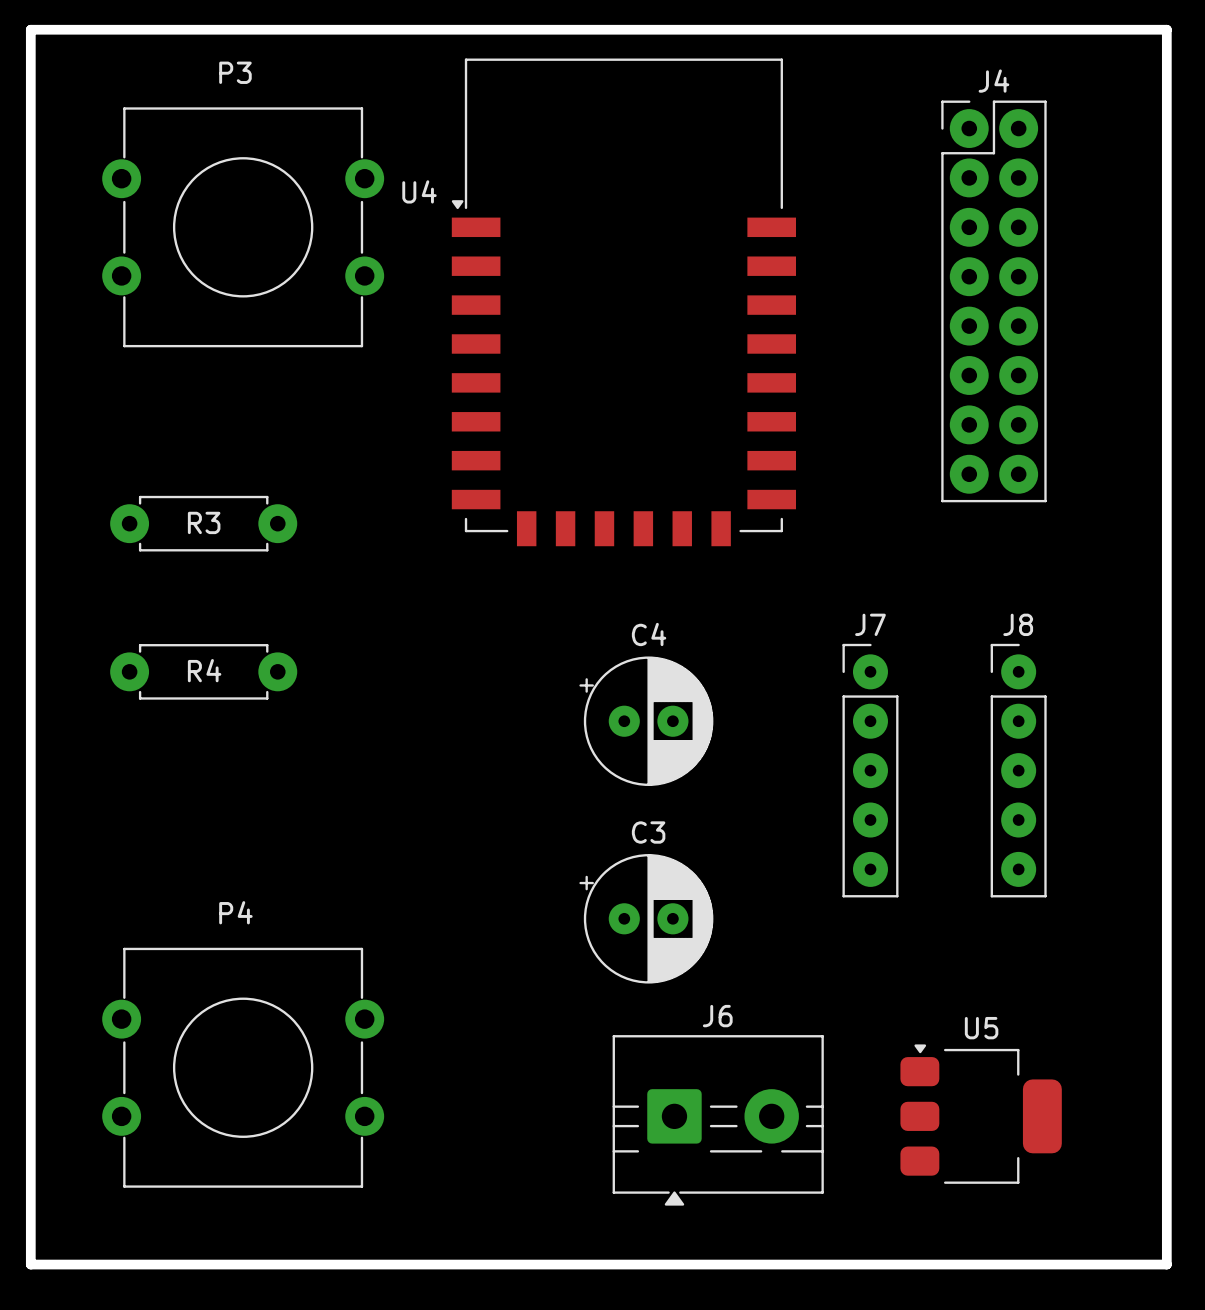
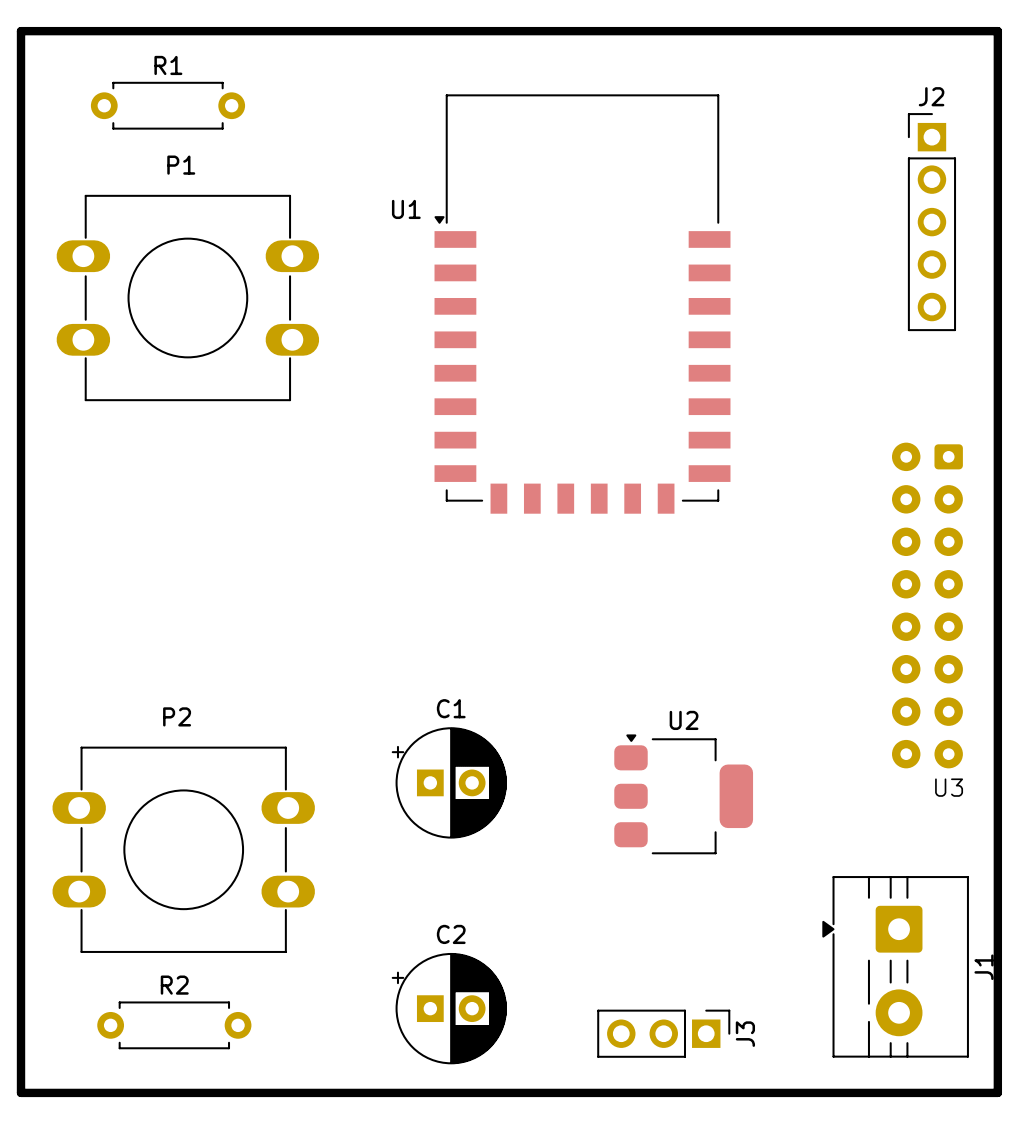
R1: none -> (167, 105)
P3: (243, 227) -> none
J2: none -> (931, 222)
J4: (993, 301) -> none
U4: (623, 302) -> none
P1: none -> (187, 298)
U1: none -> (582, 304)
R3: (203, 523) -> none
R4: (203, 671) -> none
U3: none -> (927, 605)
C4: (646, 721) -> none
J7: (870, 770) -> none
J8: (1018, 770) -> none
C1: none -> (449, 782)
U2: none -> (683, 794)
C3: (646, 918) -> none
P2: none -> (183, 849)
P4: (243, 1067) -> none
U5: (981, 1114) -> none
J1: none -> (895, 966)
J6: (718, 1120) -> none
C2: none -> (449, 1008)
R2: none -> (174, 1025)
J3: none -> (663, 1033)

